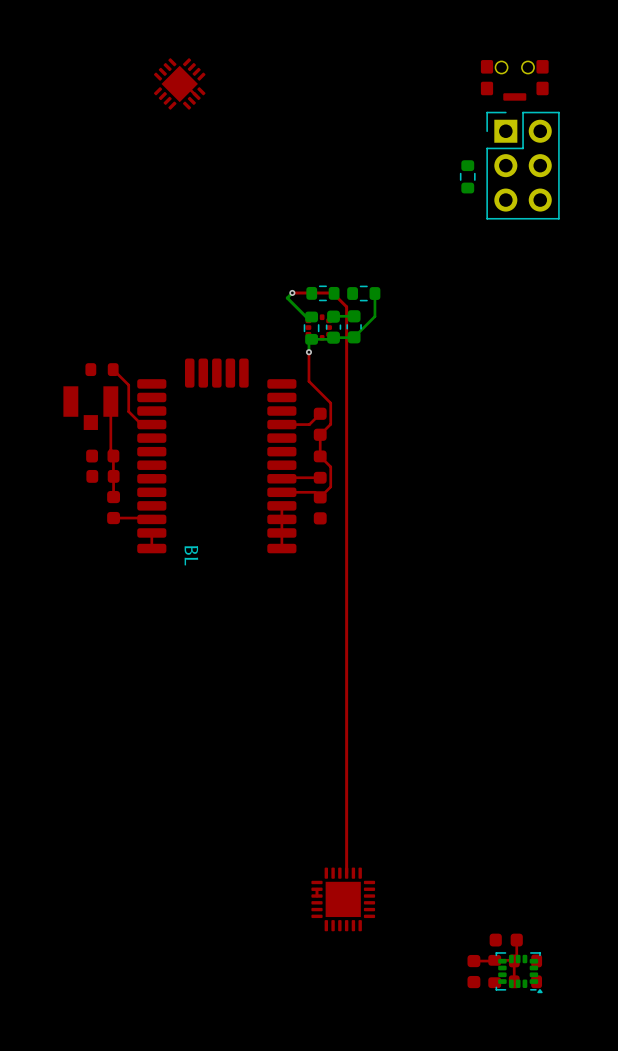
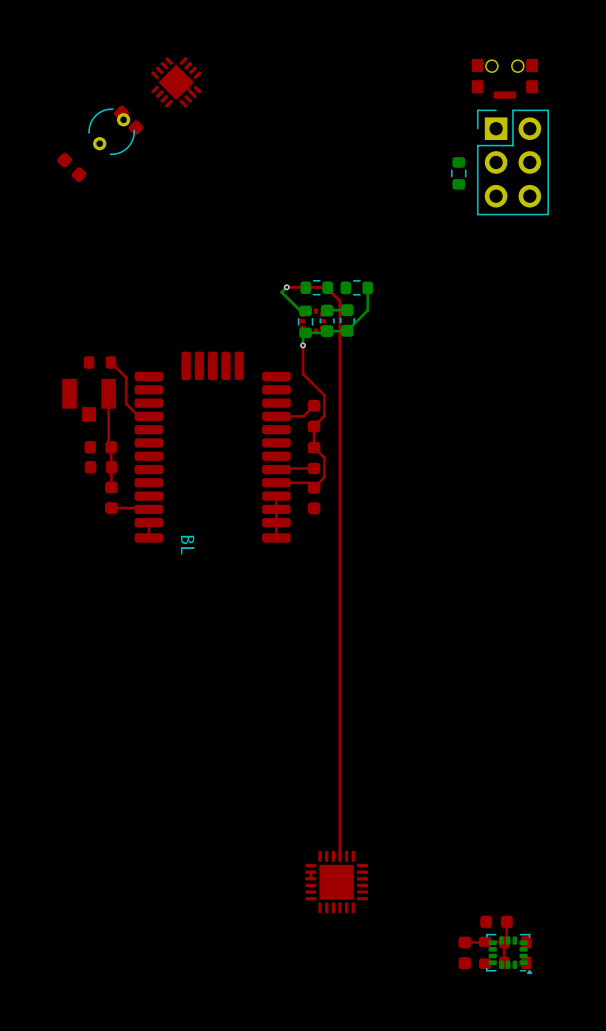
part: none -> (128, 120)
part: none -> (111, 131)
part: none -> (71, 167)

